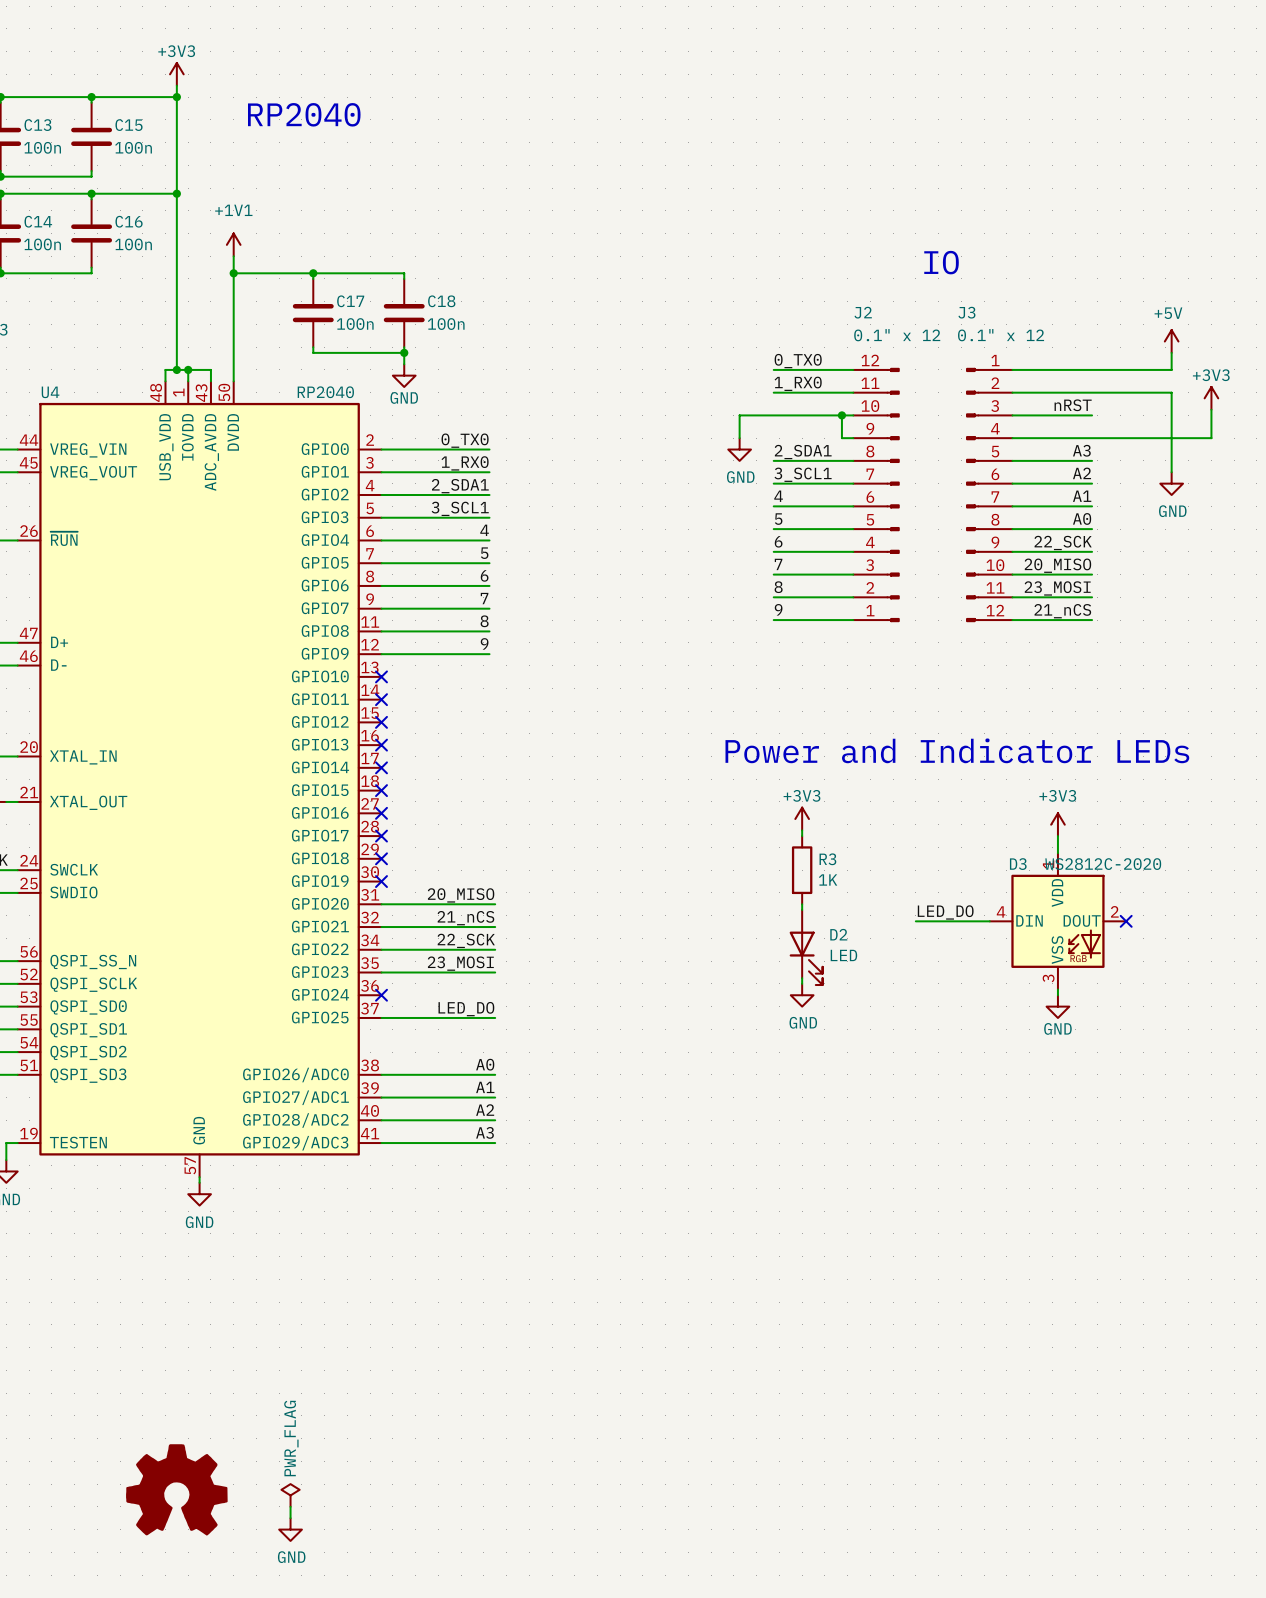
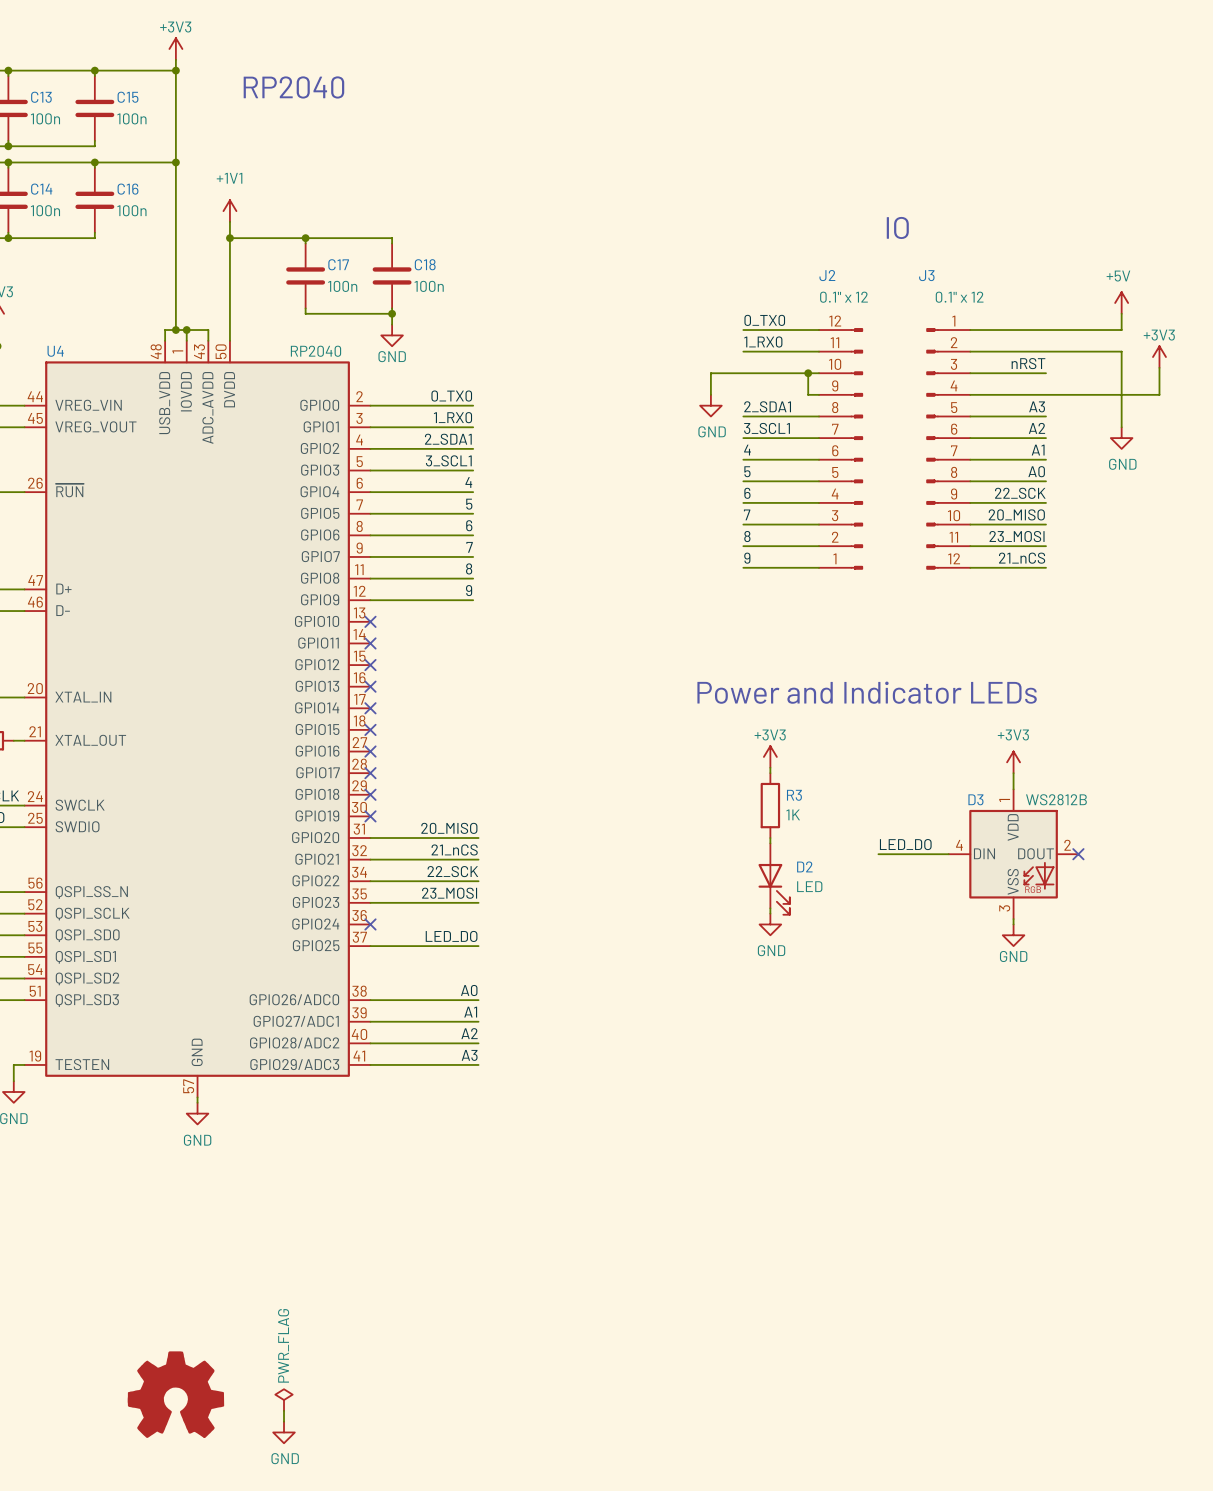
D3 value: WS2812C-2020 (1103, 864) -> WS2812B (1056, 799)

